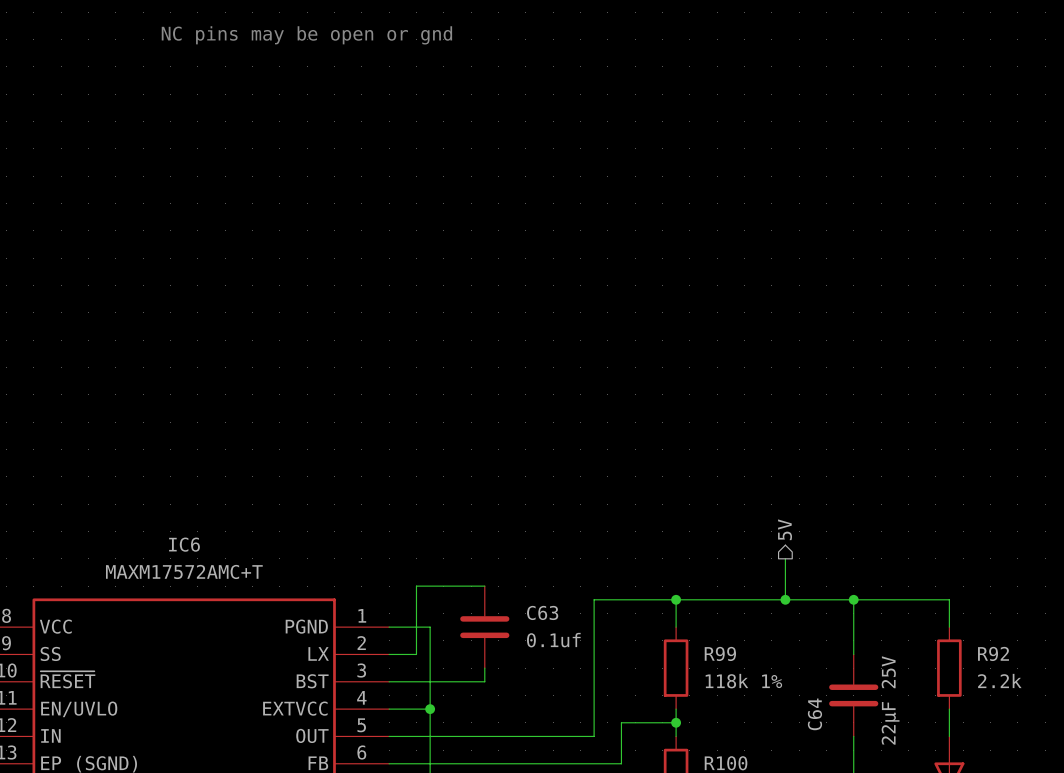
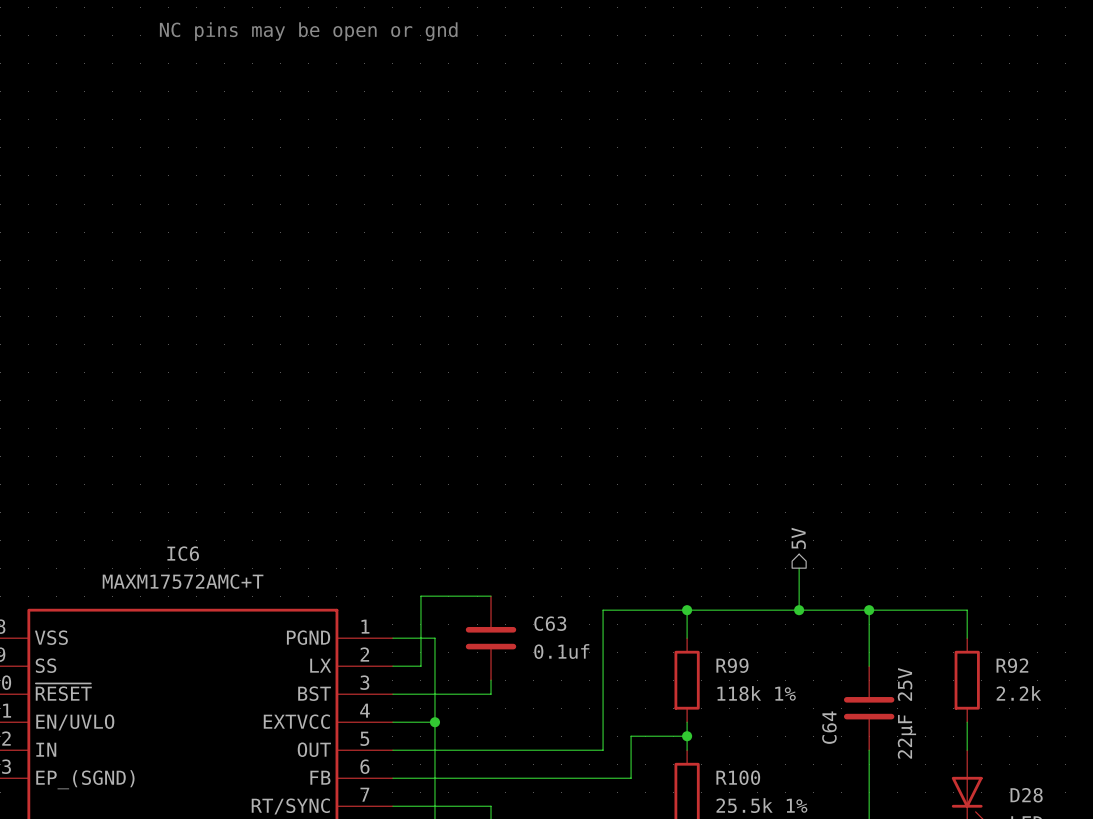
IC6 pin name: VCC (55, 626) -> VSS (51, 637)

